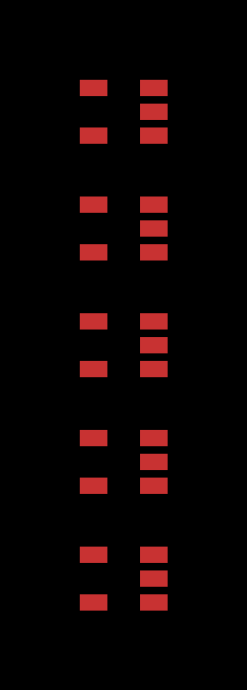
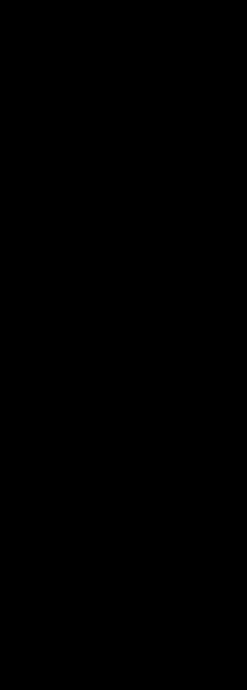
part: (123, 111) -> none
part: (123, 228) -> none
part: (123, 345) -> none
part: (123, 461) -> none
part: (123, 578) -> none

